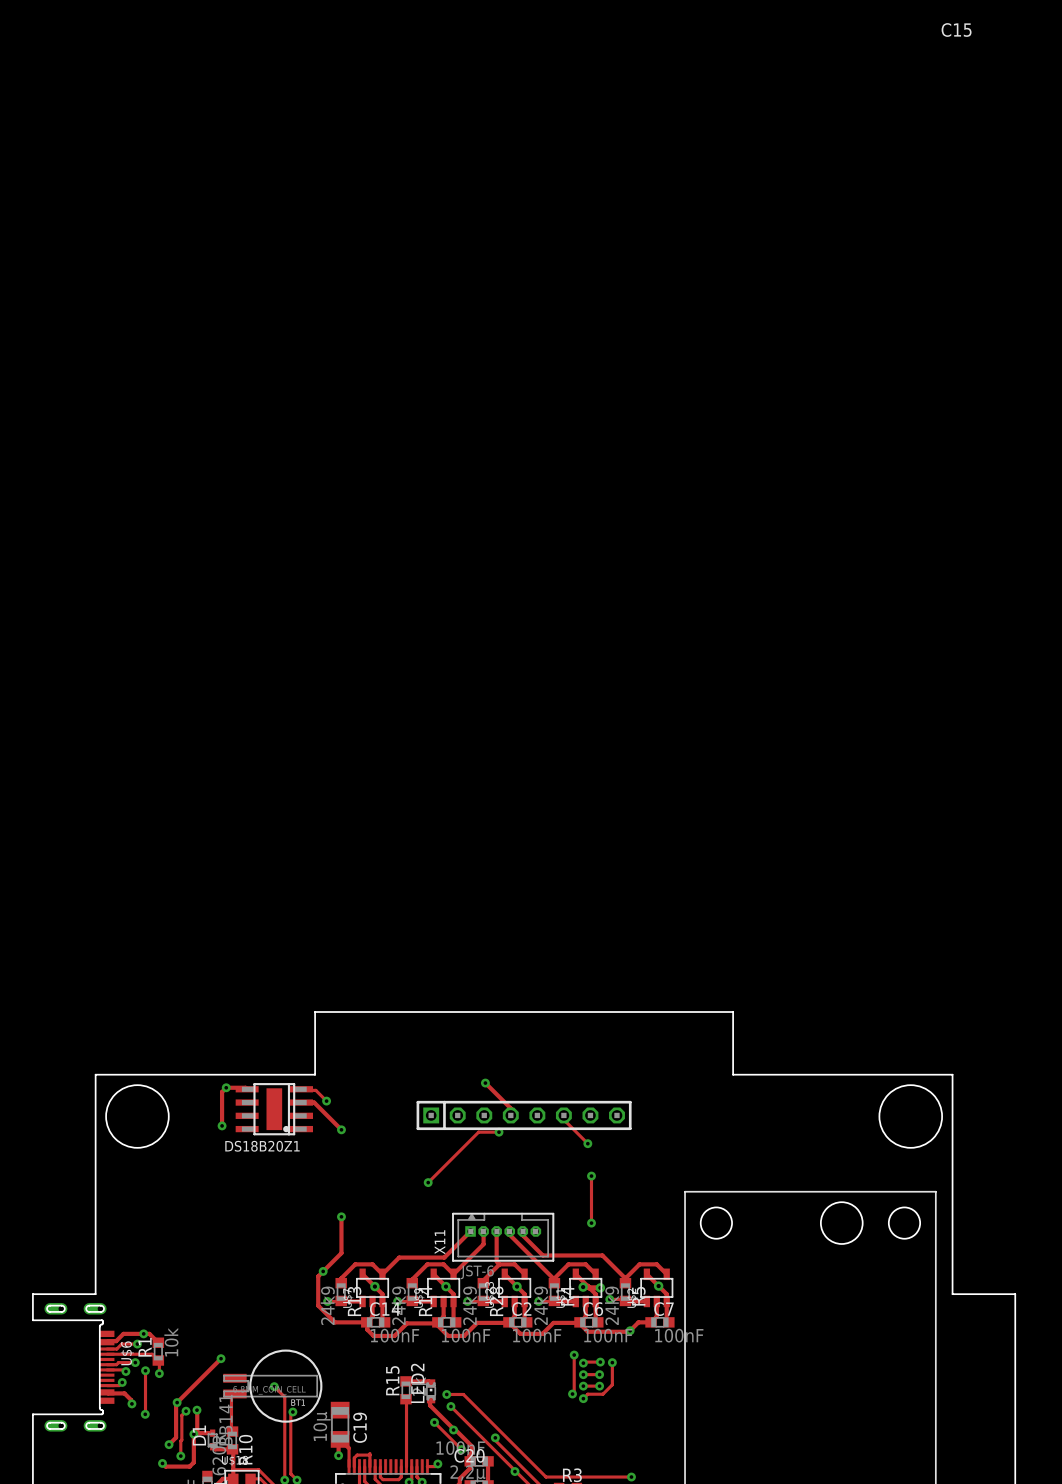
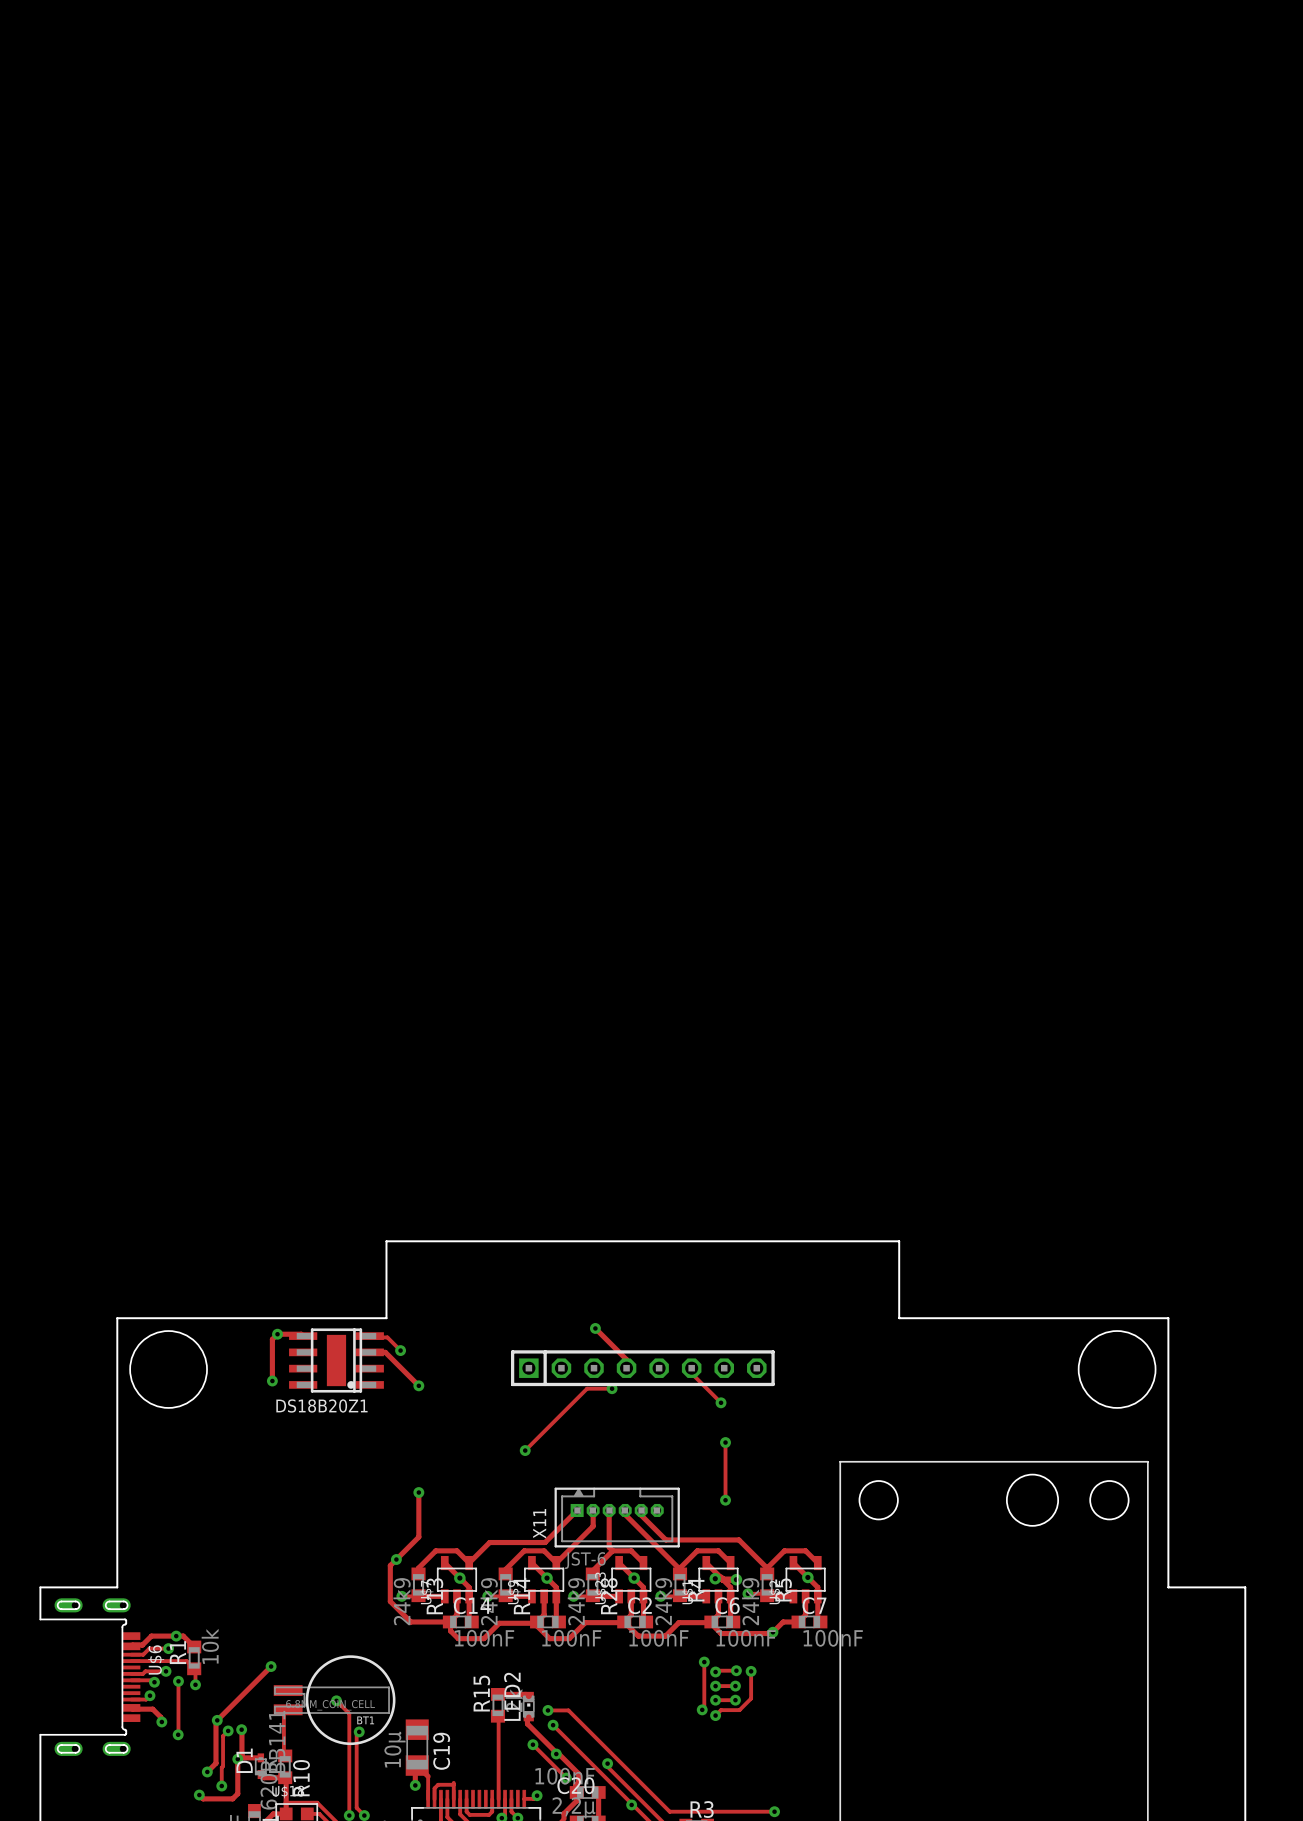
C15 name: C15 (956, 29) -> none

